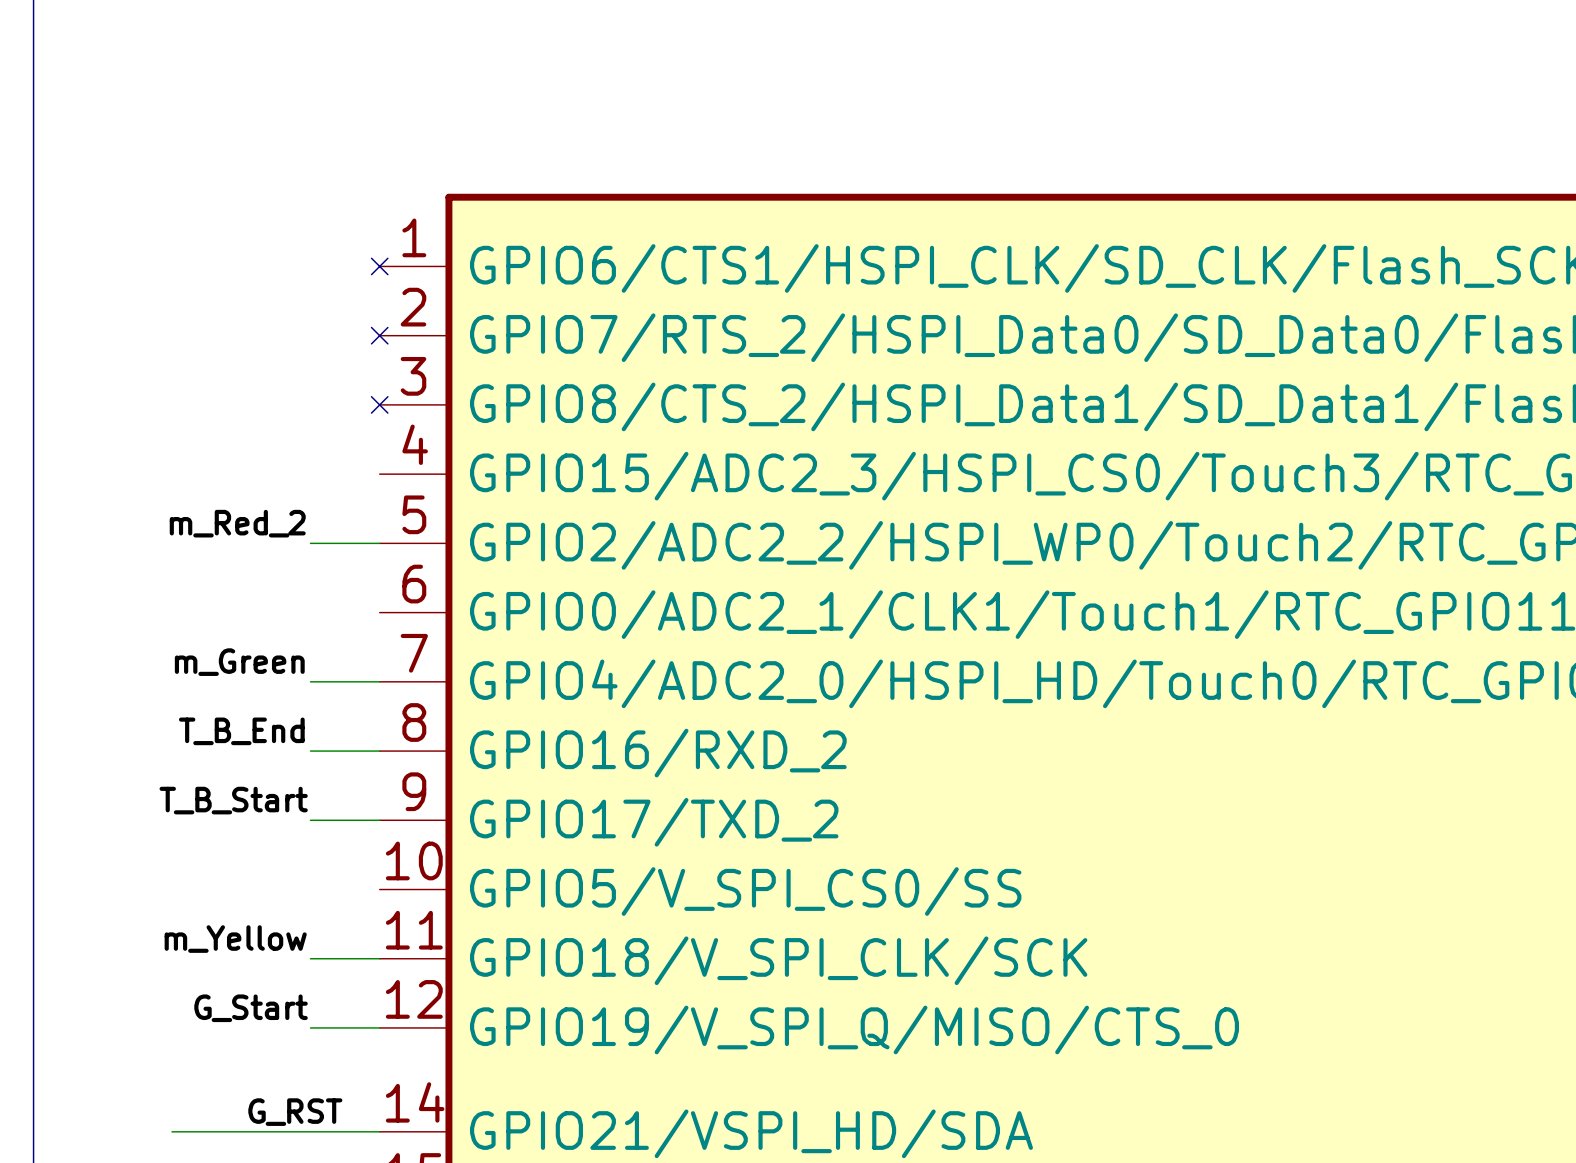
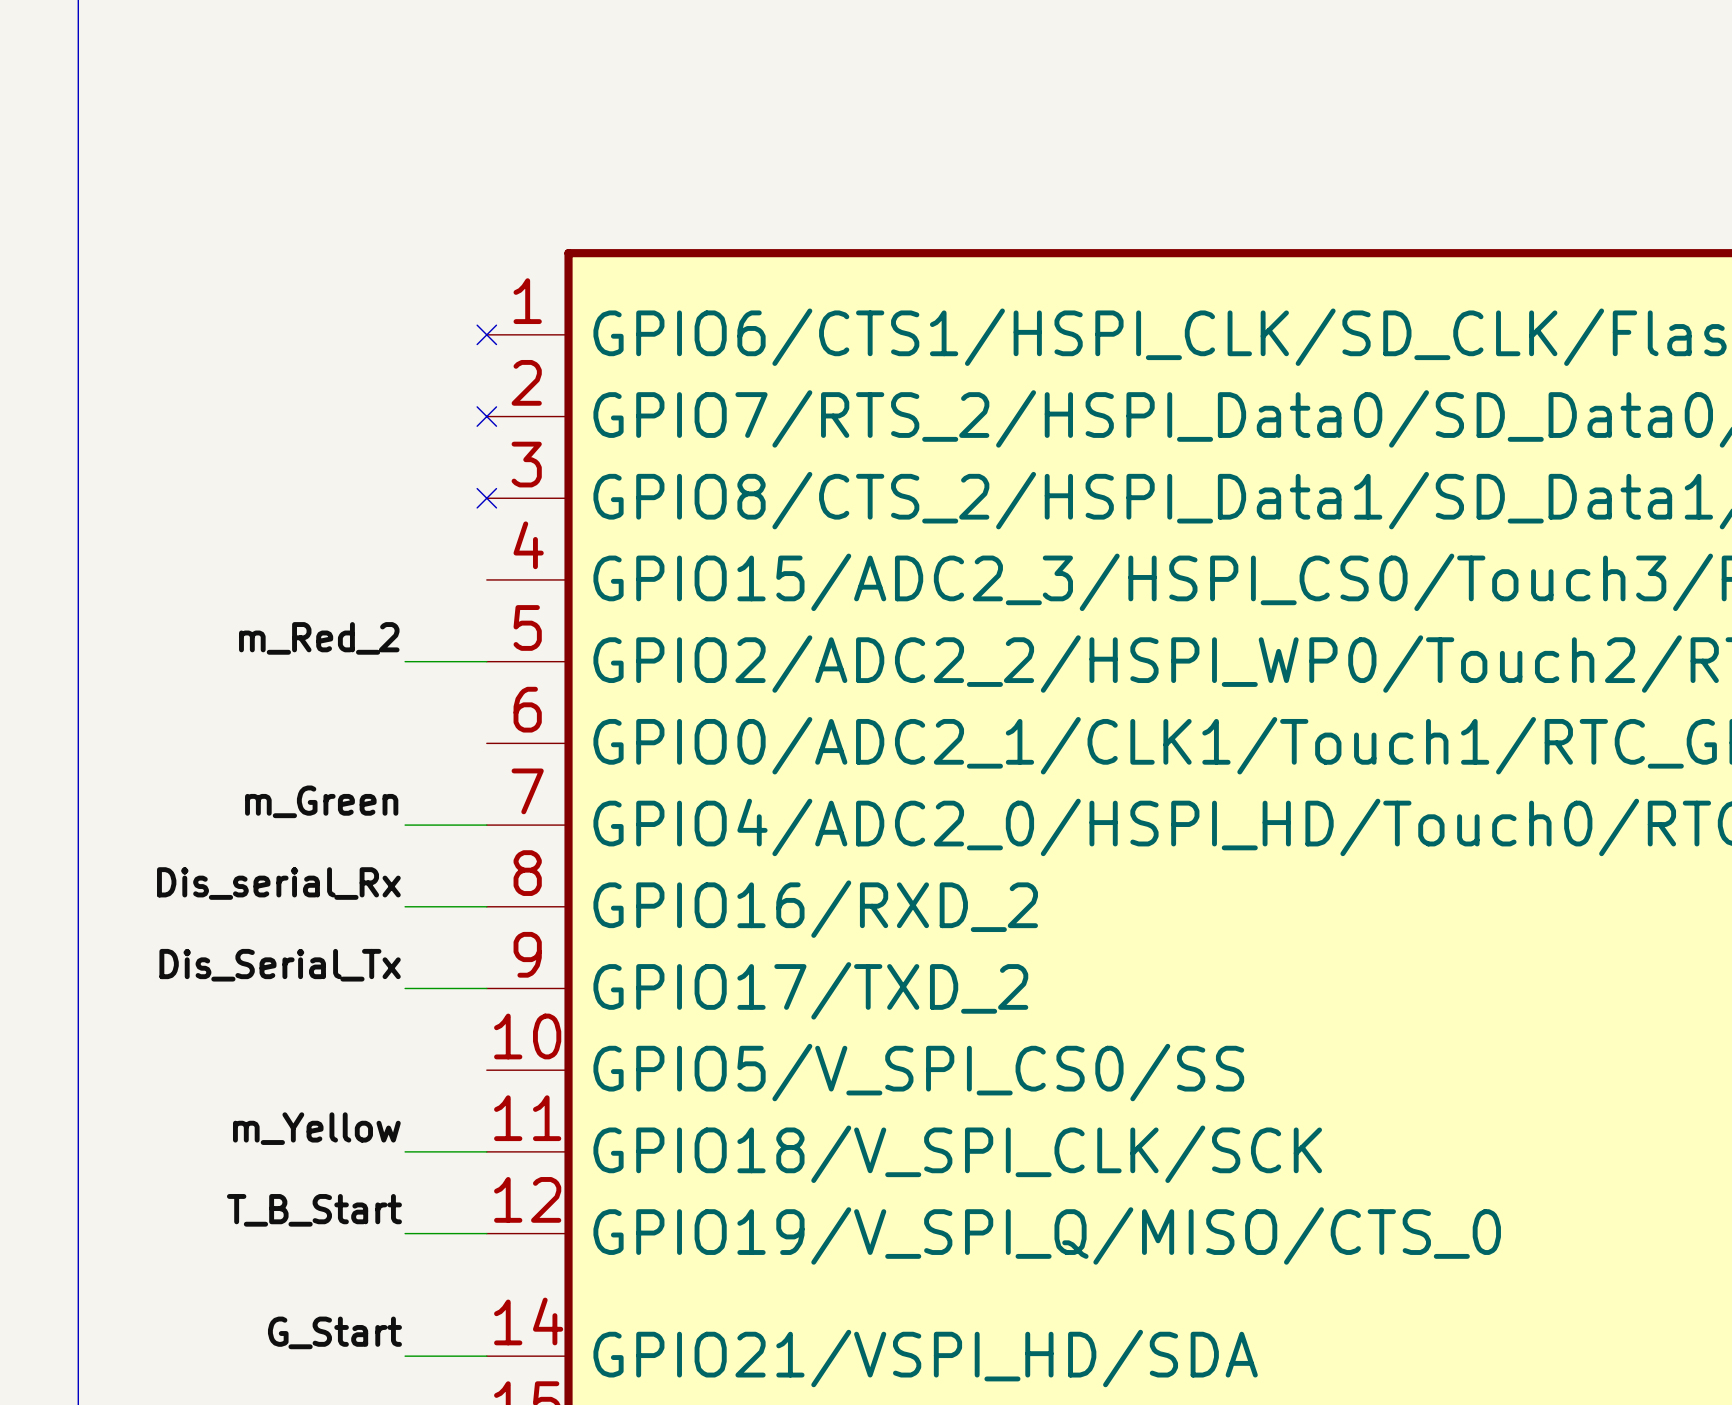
label: T_B_End (241, 731) -> Dis_serial_Rx (278, 883)
label: T_B_Start (233, 800) -> Dis_Serial_Tx (280, 965)
label: G_Start (251, 1008) -> T_B_Start (314, 1210)
label: none -> G_Start (334, 1332)
label: G_RST (295, 1112) -> none
wire: (172, 1131) (310, 1131) -> none

